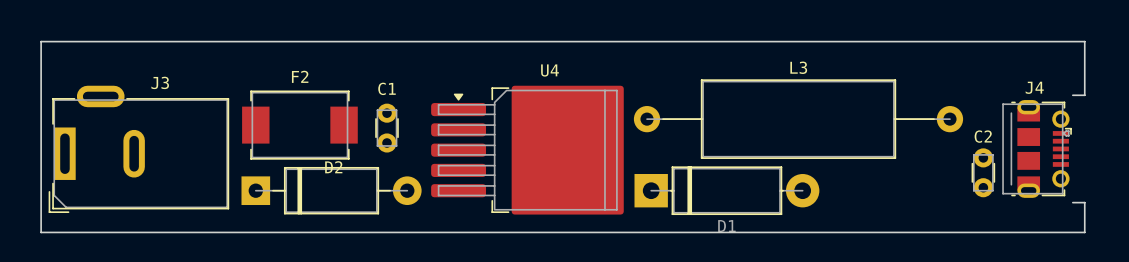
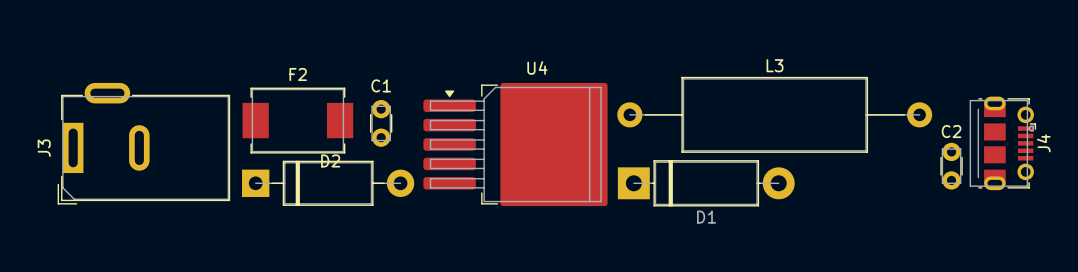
J3 name rotation: 0° (160, 82) -> 90° counterclockwise (44, 148)
J3 name position: J3 (160, 82) -> J3 (44, 148)
J4 name rotation: 0° (1034, 87) -> 90° counterclockwise (1043, 143)
J4 name position: J4 (1034, 87) -> J4 (1043, 143)
board edge: (1072, 95) (1084, 95) (1084, 41) (41, 41) (41, 232) (1084, 232) (1084, 202) (1072, 202) -> none

